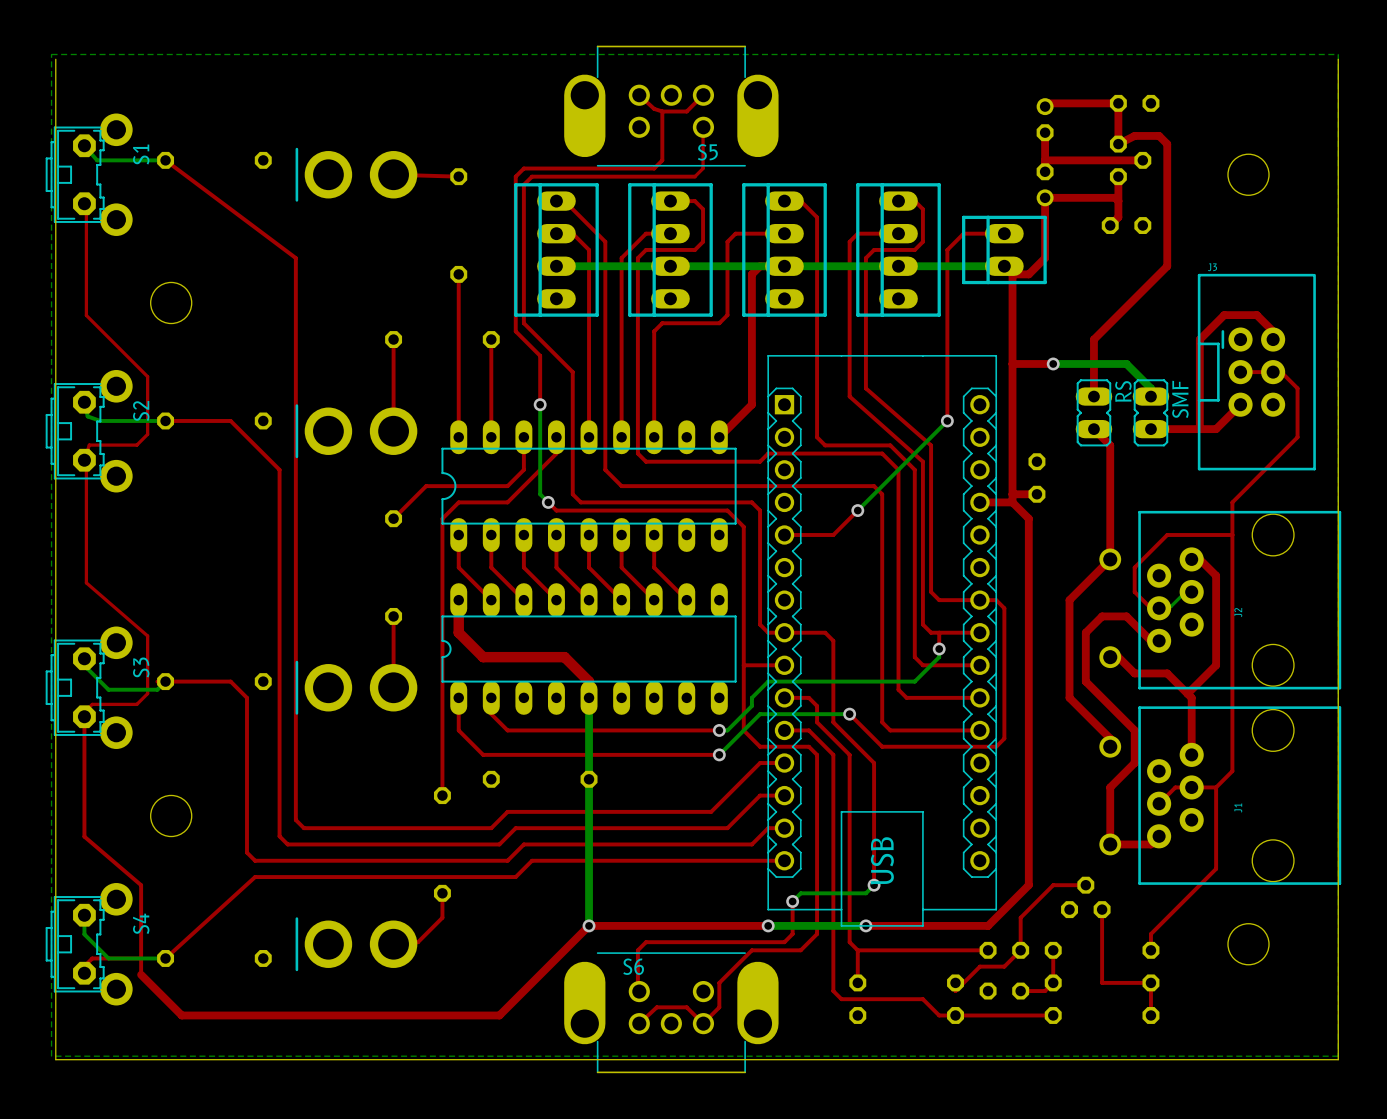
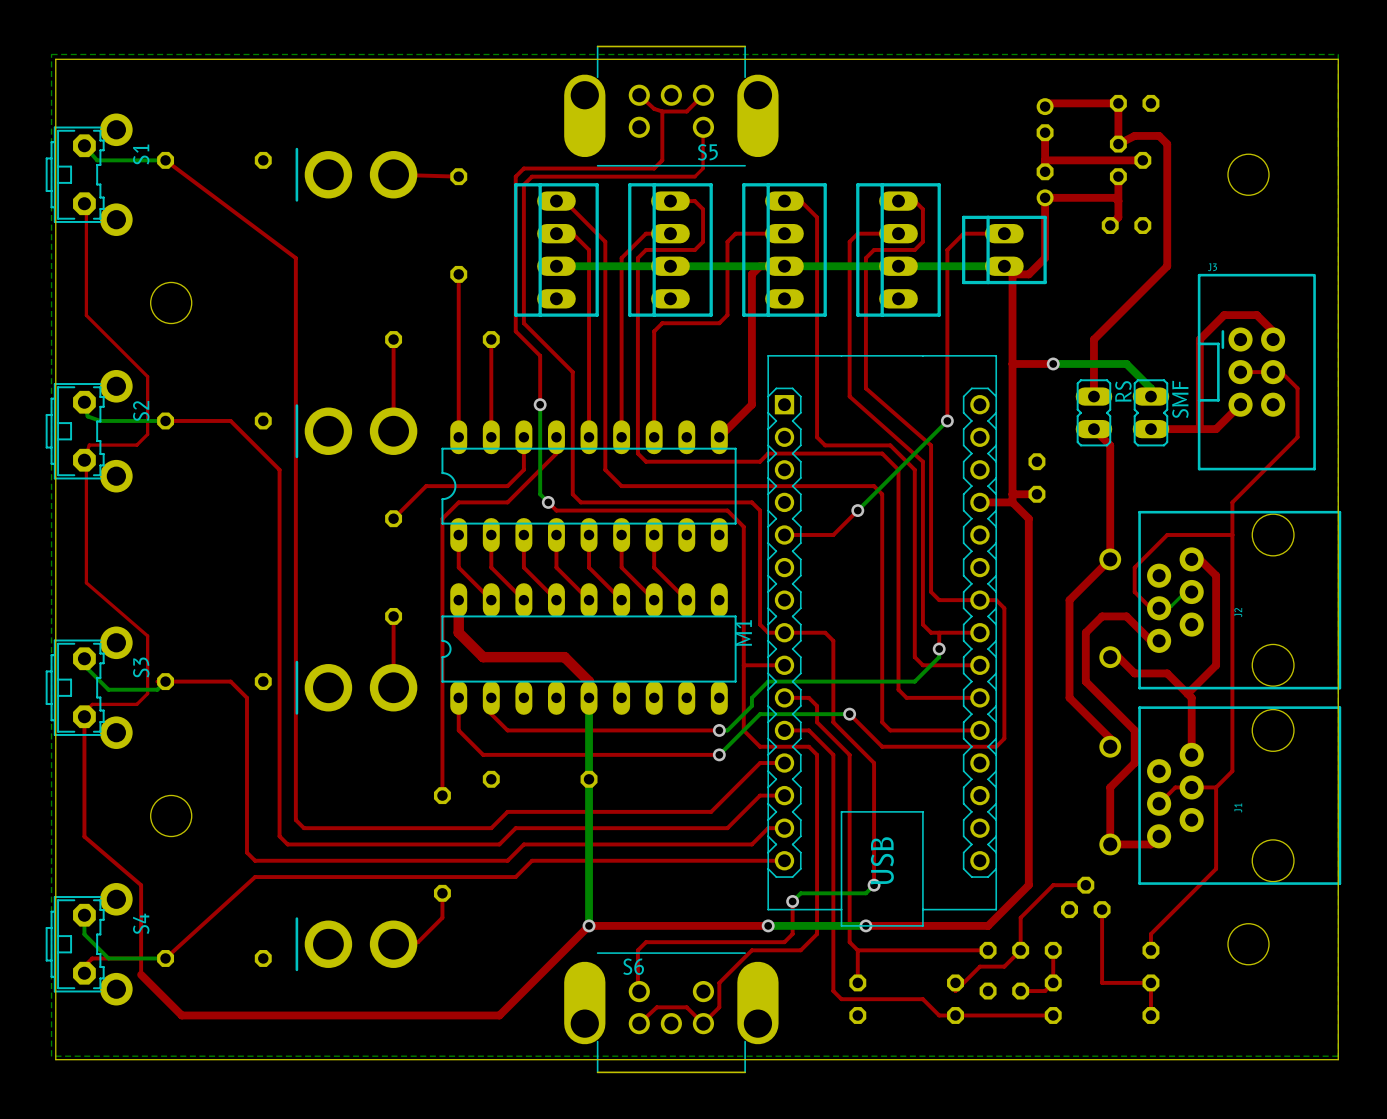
board edge: none -> (1338, 59) (55, 59)
M1 name: none -> M1 (743, 633)

